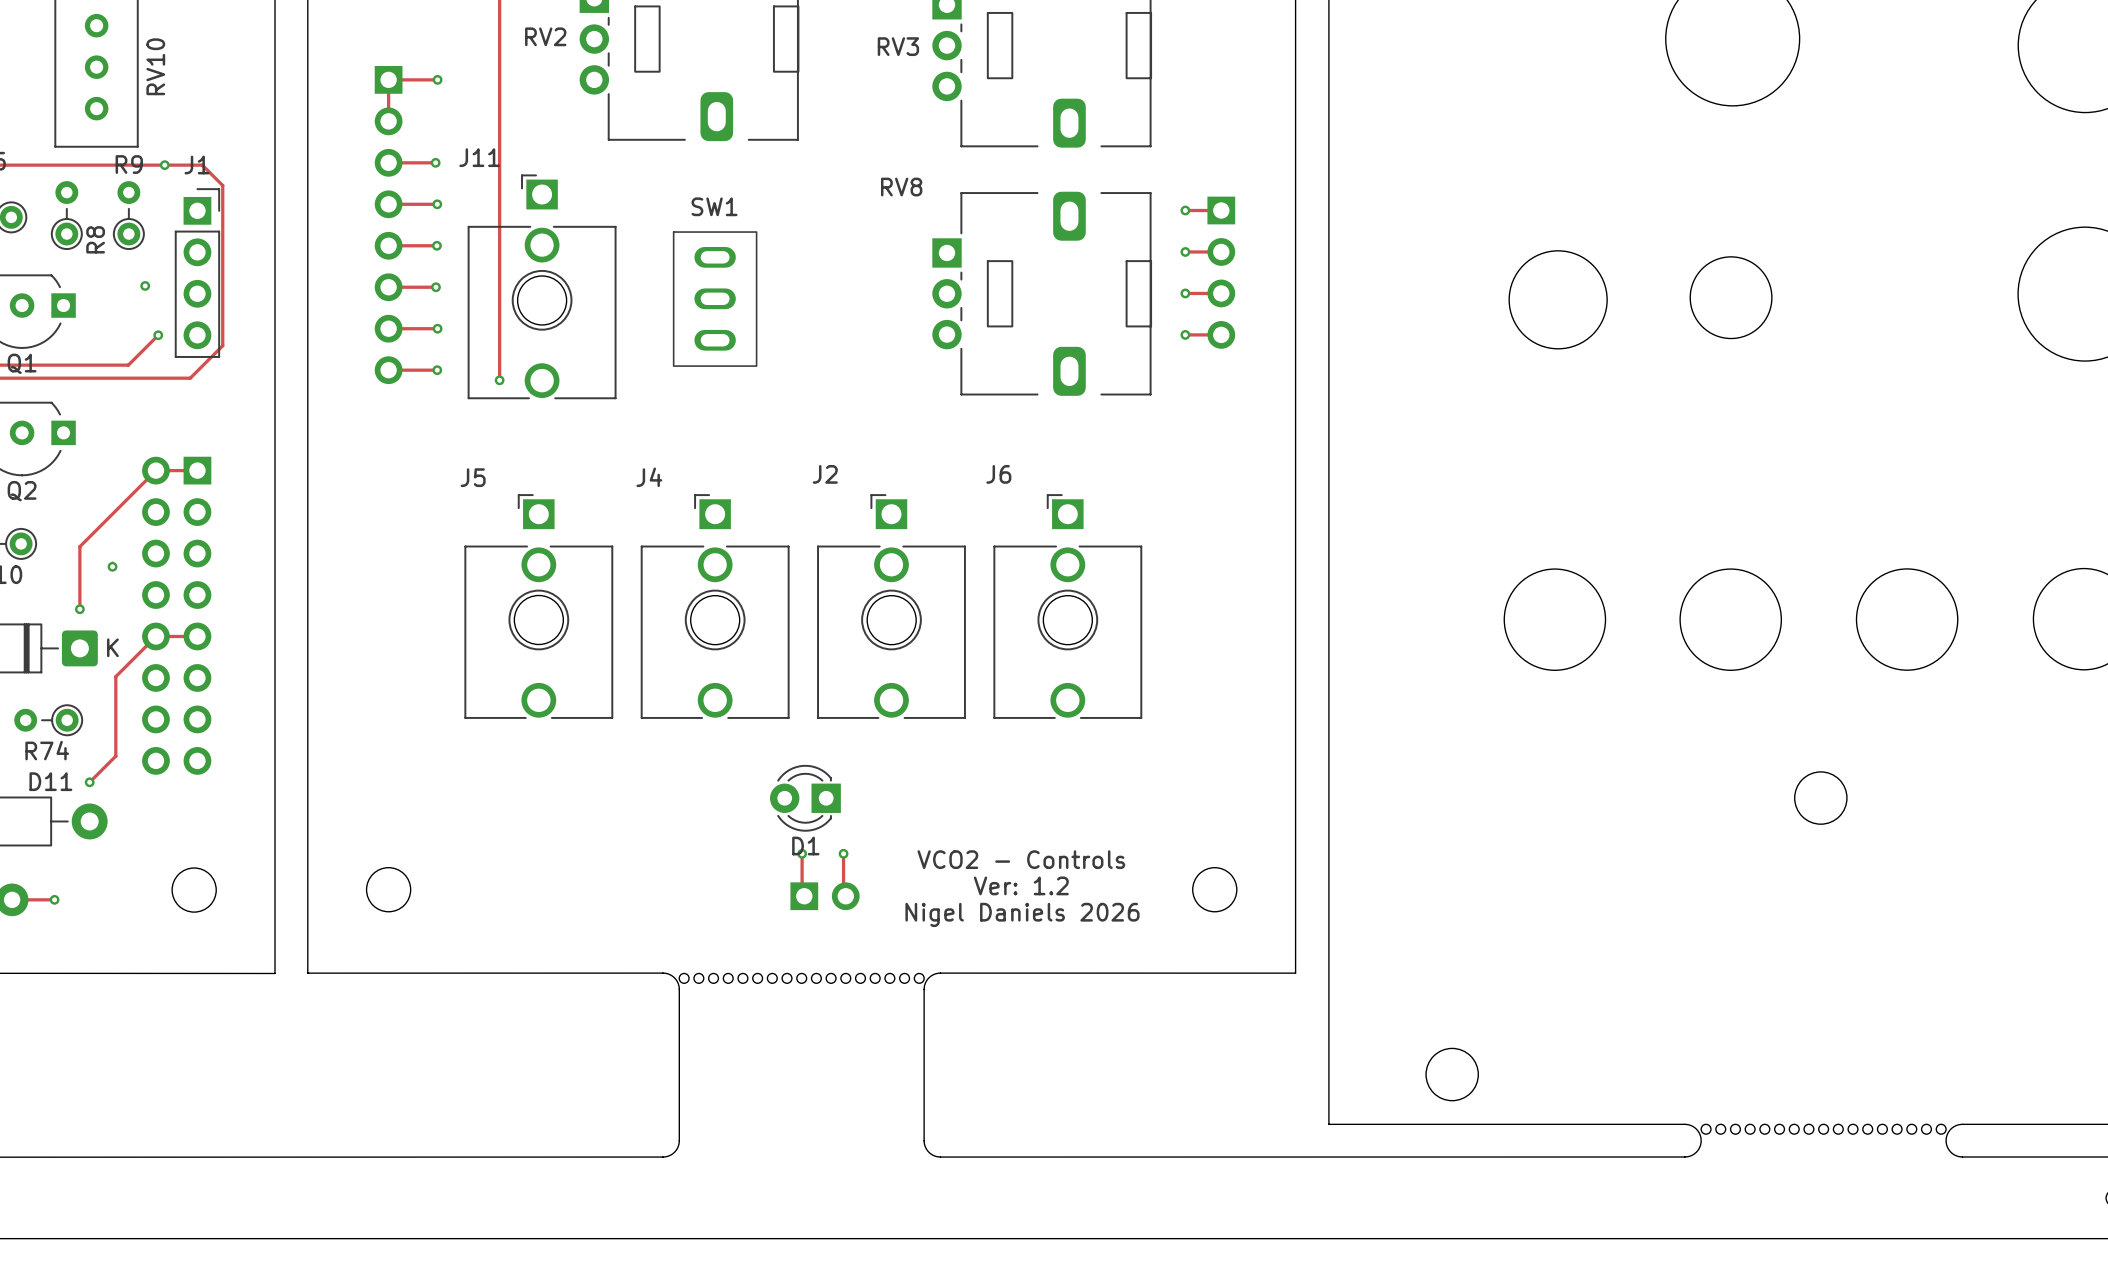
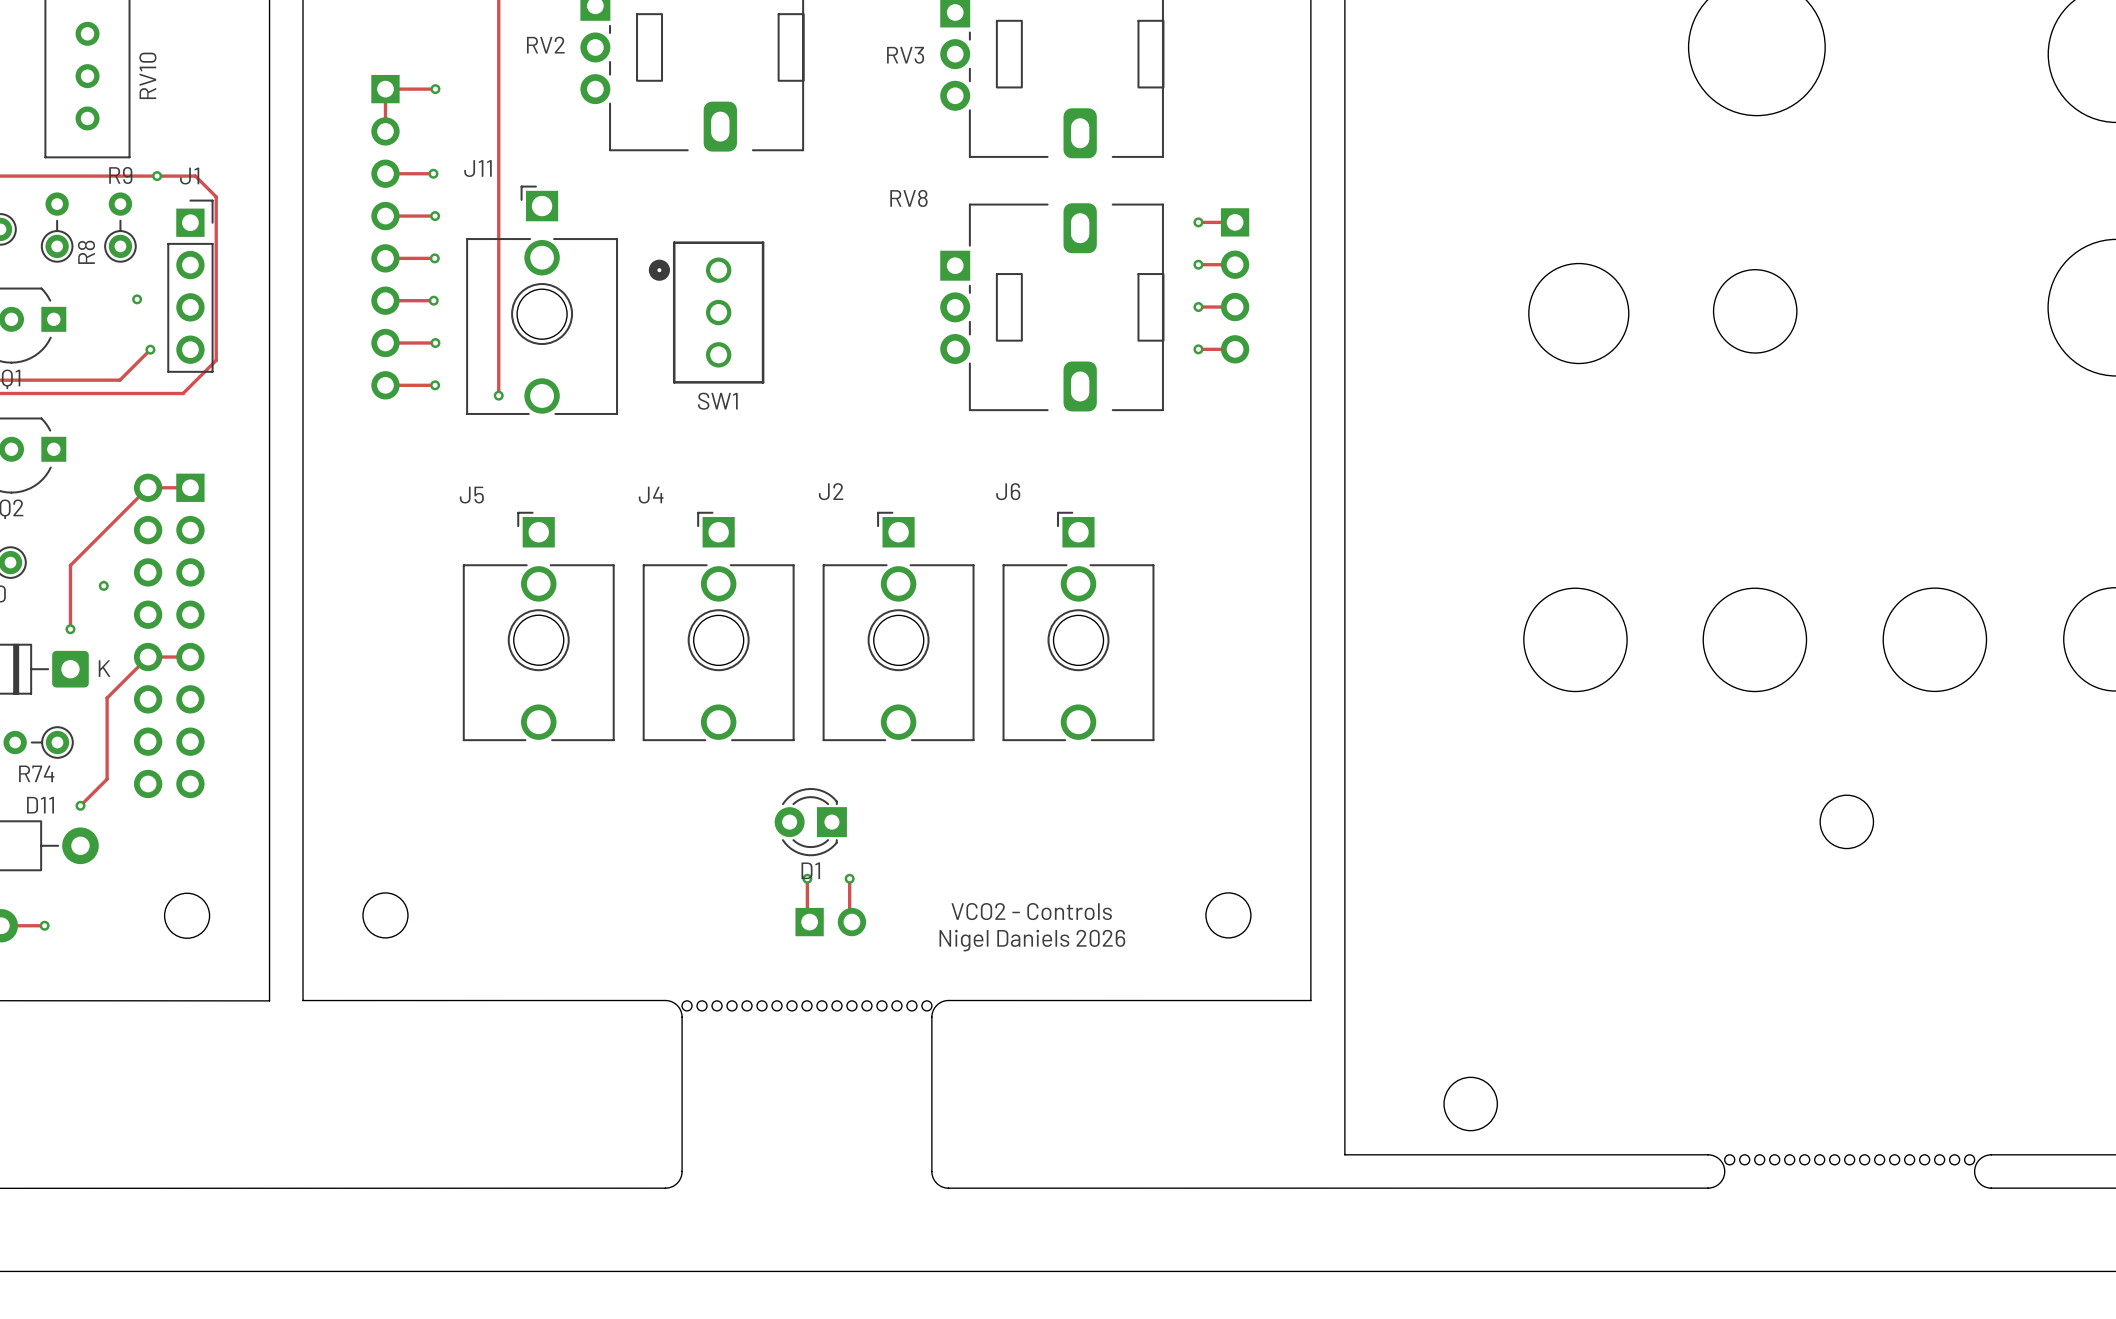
SW1 name position: SW1 (714, 206) -> SW1 (717, 401)
SW1 footprint: [672, 231, 758, 367] -> [648, 241, 765, 384]
text: VCO2 - Controls (1021, 859) -> none
text: Ver: 1.2 (1021, 885) -> VCO2 - Controls (1031, 911)

